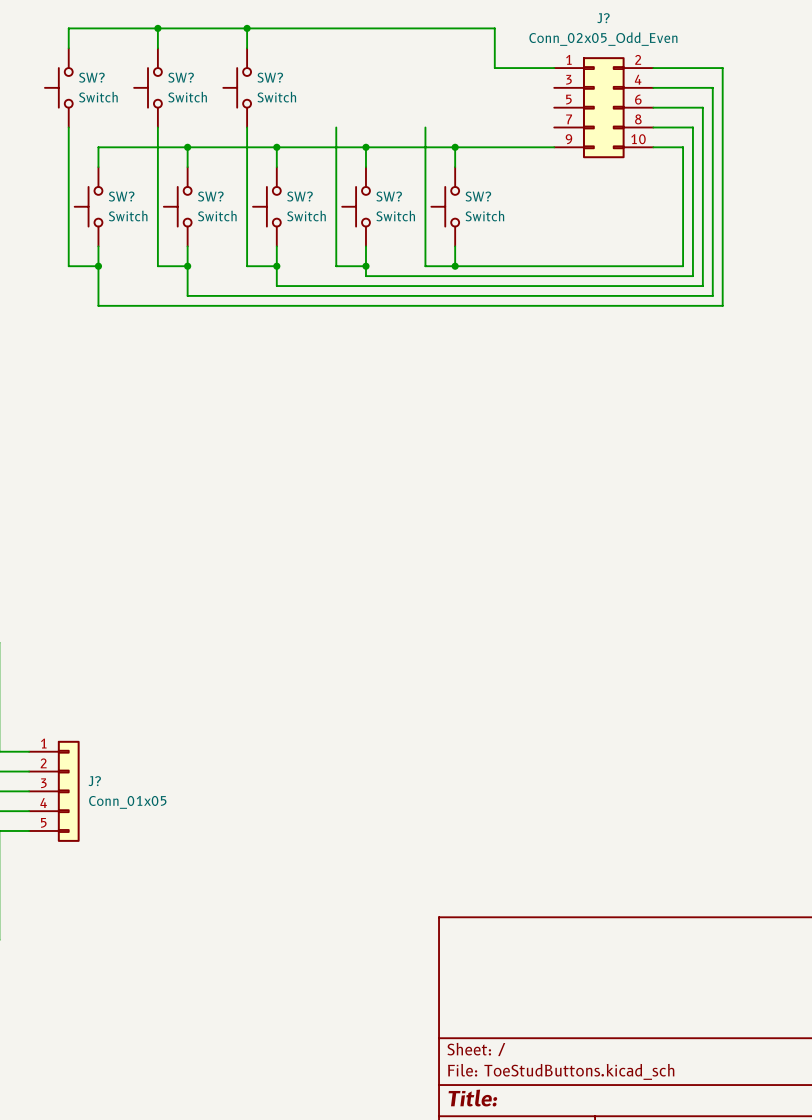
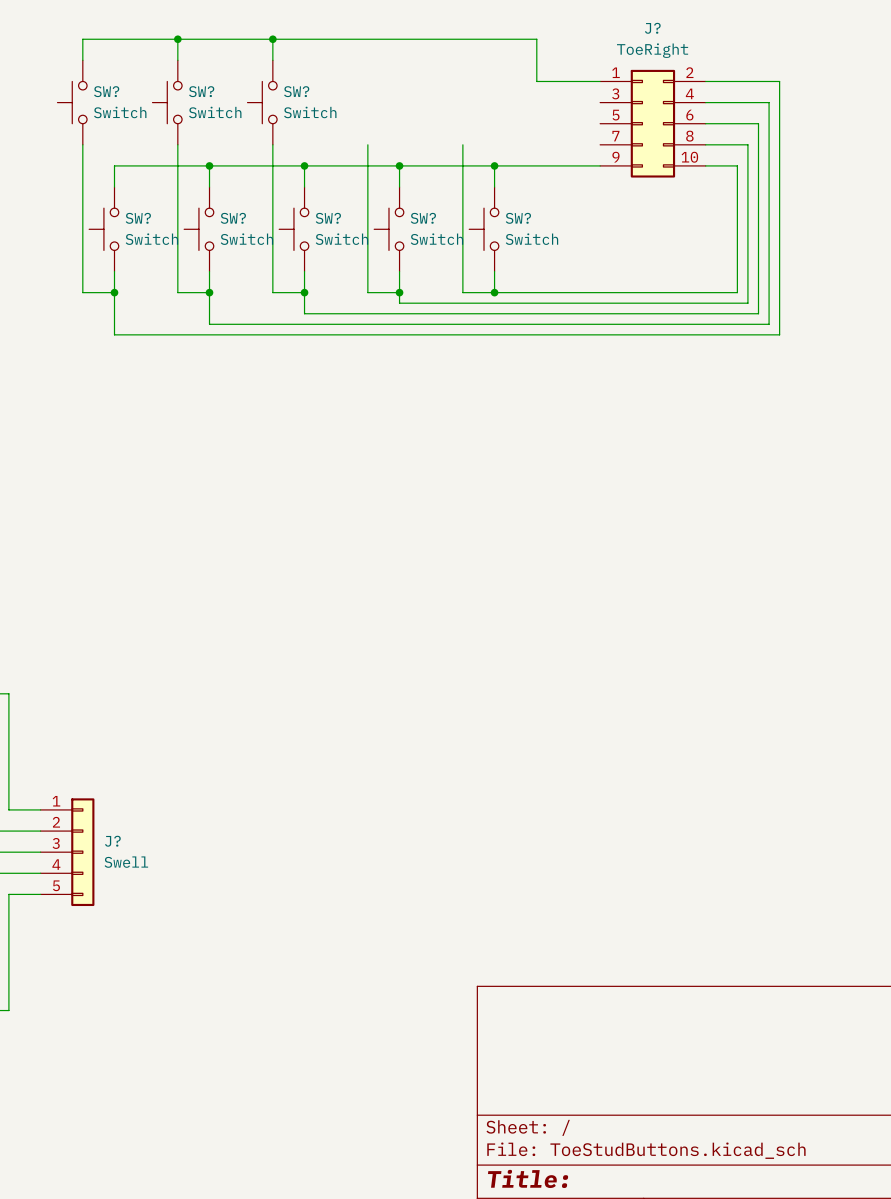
J? value: Conn_02x05_Odd_Even (603, 39) -> ToeRight (652, 50)
J? value: Conn_01x05 (127, 802) -> Swell (126, 862)

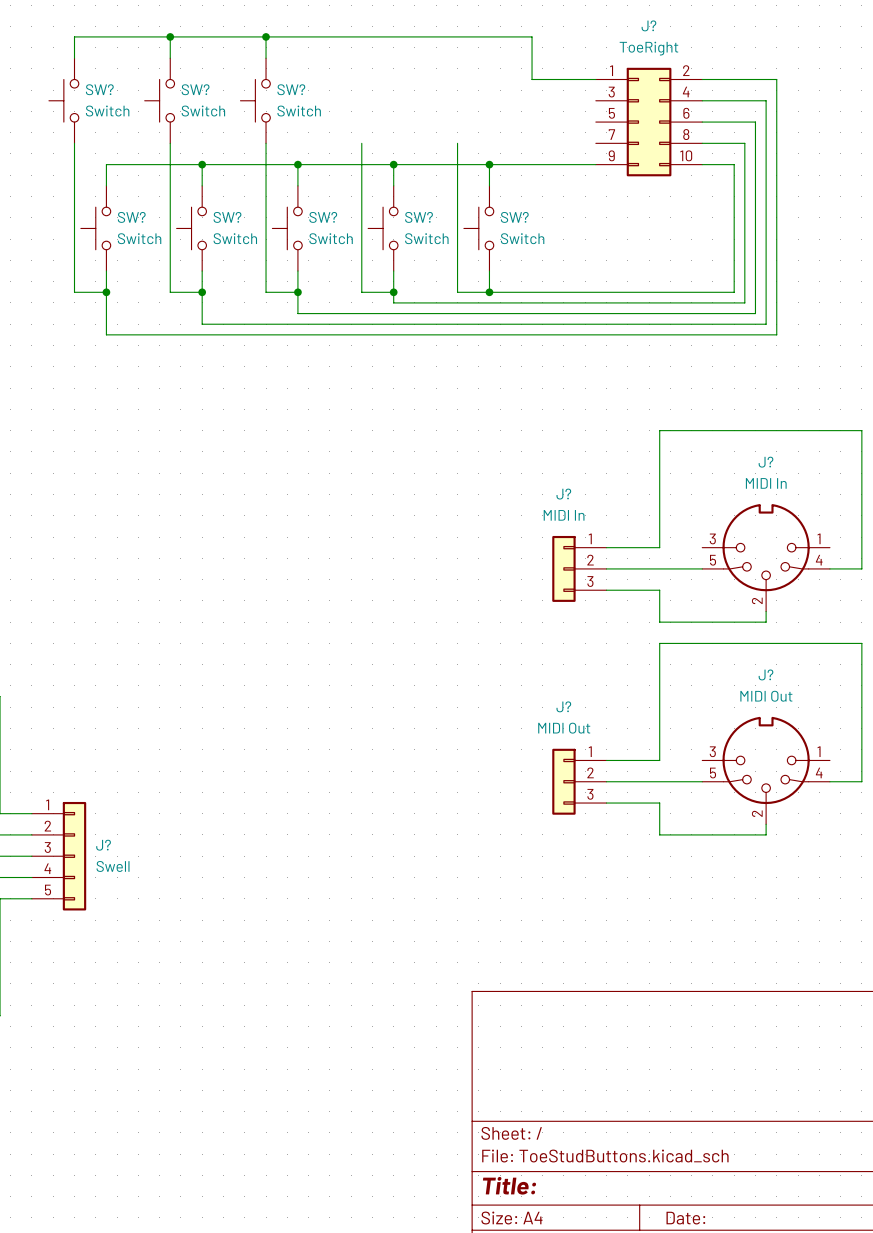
wire: none -> (606, 547) (659, 547) (659, 430) (861, 430) (861, 568) (829, 568)
J?: none -> MIDI In (766, 557)
J?: none -> MIDI In (579, 568)
wire: none -> (606, 568) (702, 568)
wire: none -> (606, 590) (659, 590) (659, 622) (766, 622) (766, 611)
wire: none -> (606, 760) (659, 760) (659, 643) (861, 643) (861, 781) (829, 781)
J?: none -> MIDI Out (766, 770)
J?: none -> MIDI Out (579, 781)
wire: none -> (606, 781) (702, 781)
wire: none -> (606, 803) (659, 803) (659, 834) (766, 834) (766, 824)

